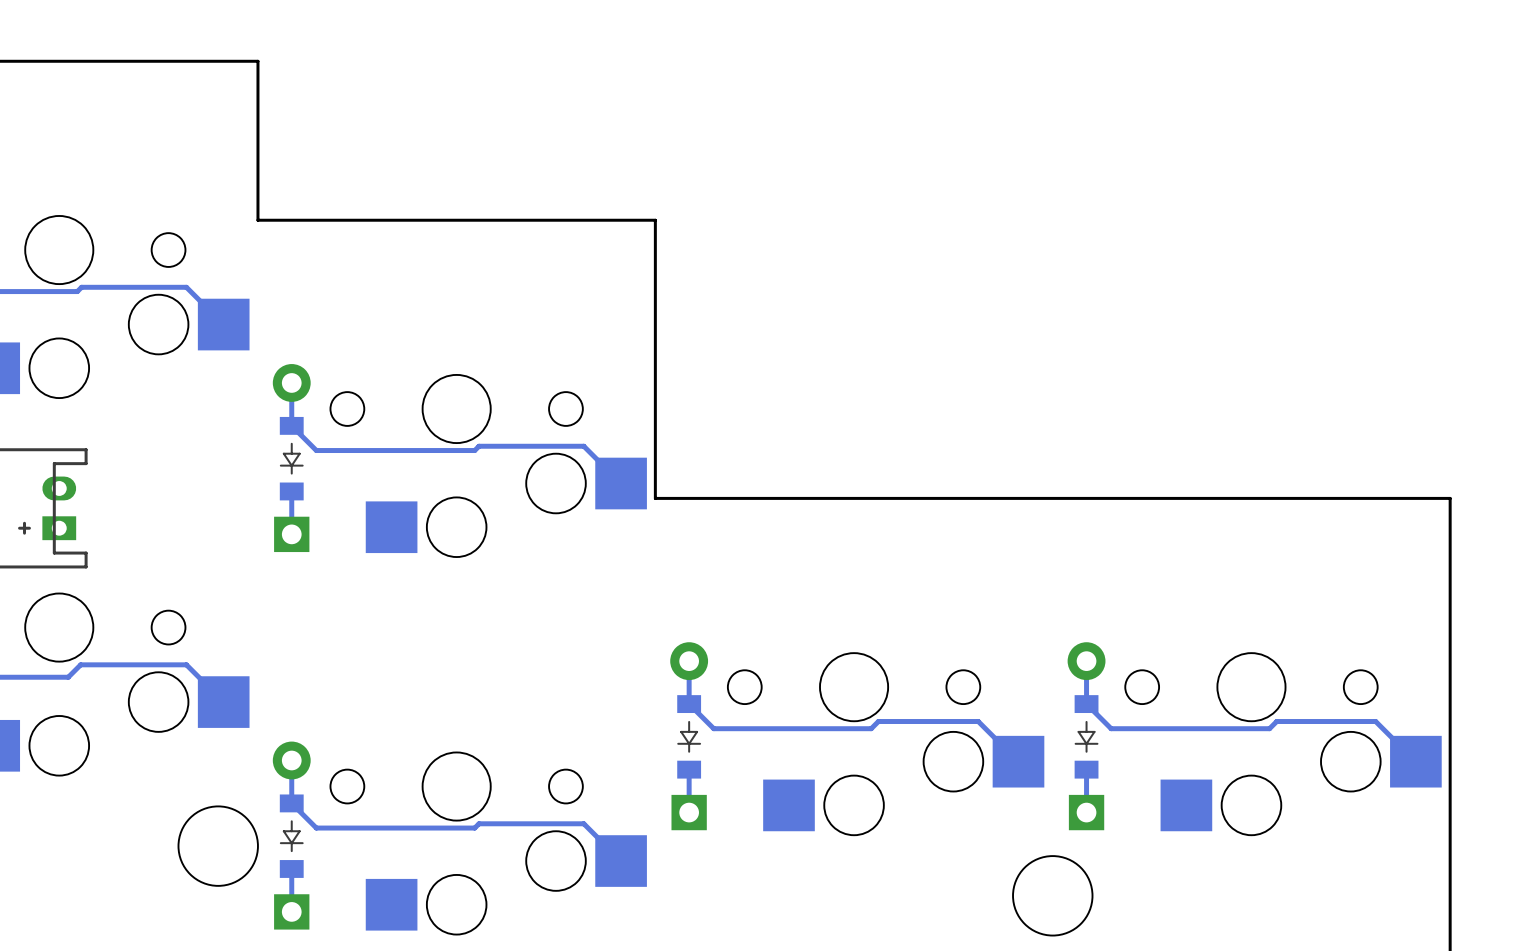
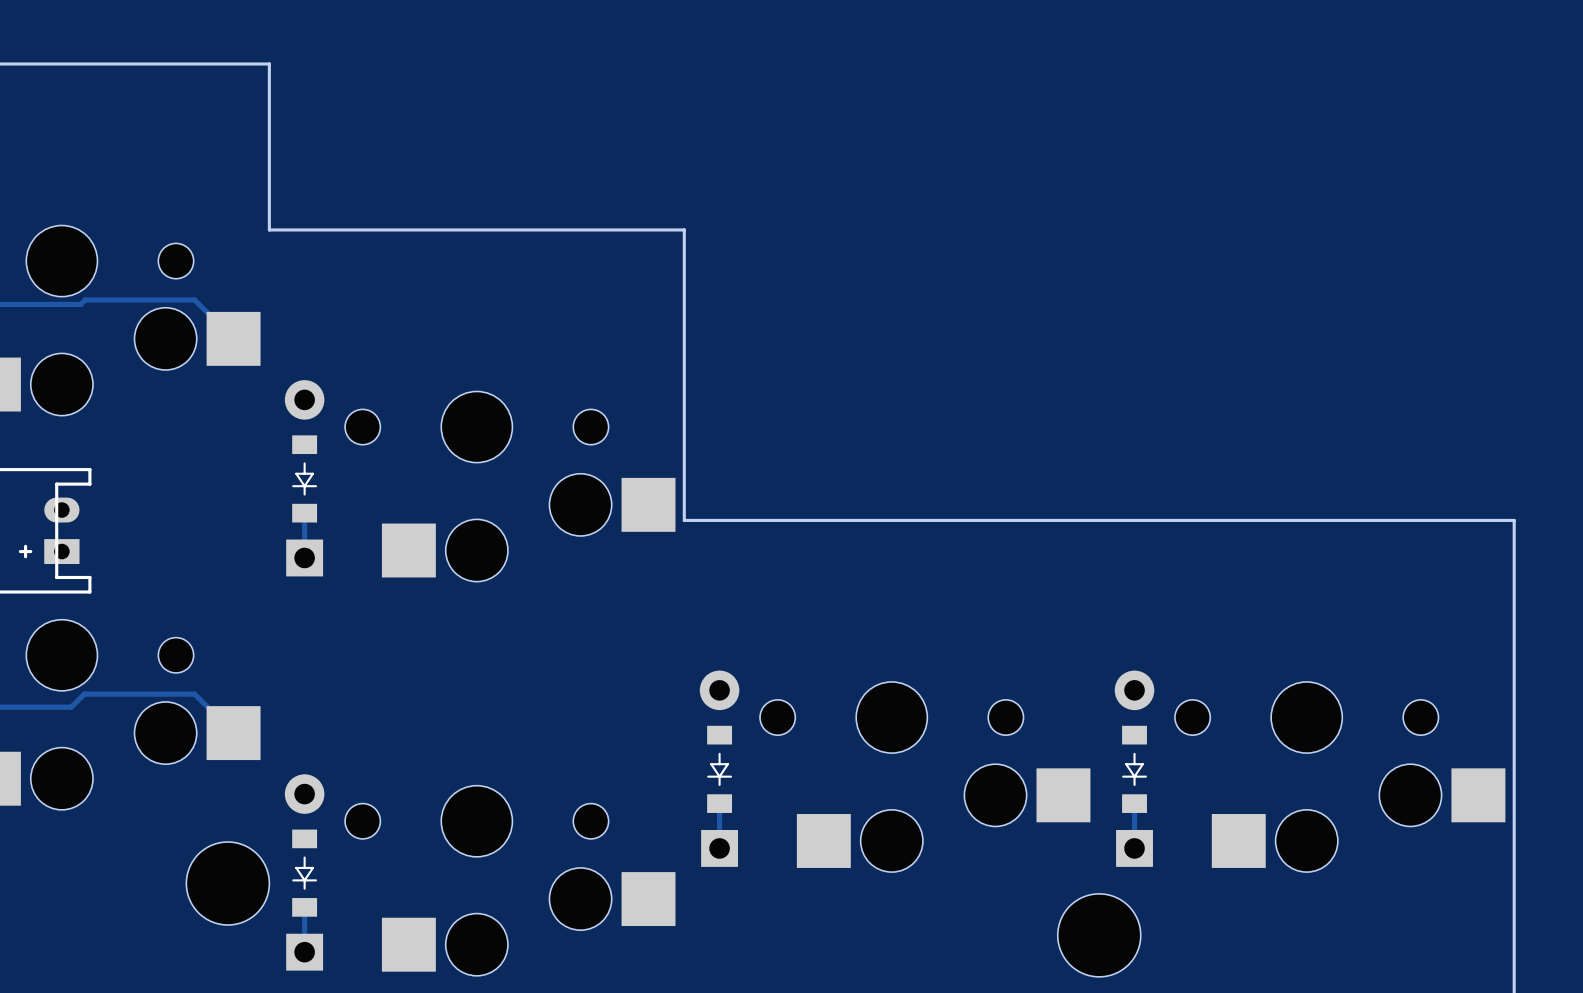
track: (291, 382) (291, 425) (316, 450) (474, 450) (479, 446) (583, 446) (621, 483) -> none
track: (689, 661) (689, 704) (713, 728) (871, 728) (878, 721) (978, 721) (1018, 761) -> none
track: (1086, 661) (1086, 704) (1111, 728) (1269, 728) (1276, 721) (1375, 721) (1415, 761) -> none
track: (291, 760) (291, 803) (316, 828) (474, 828) (479, 823) (583, 823) (621, 861) -> none

